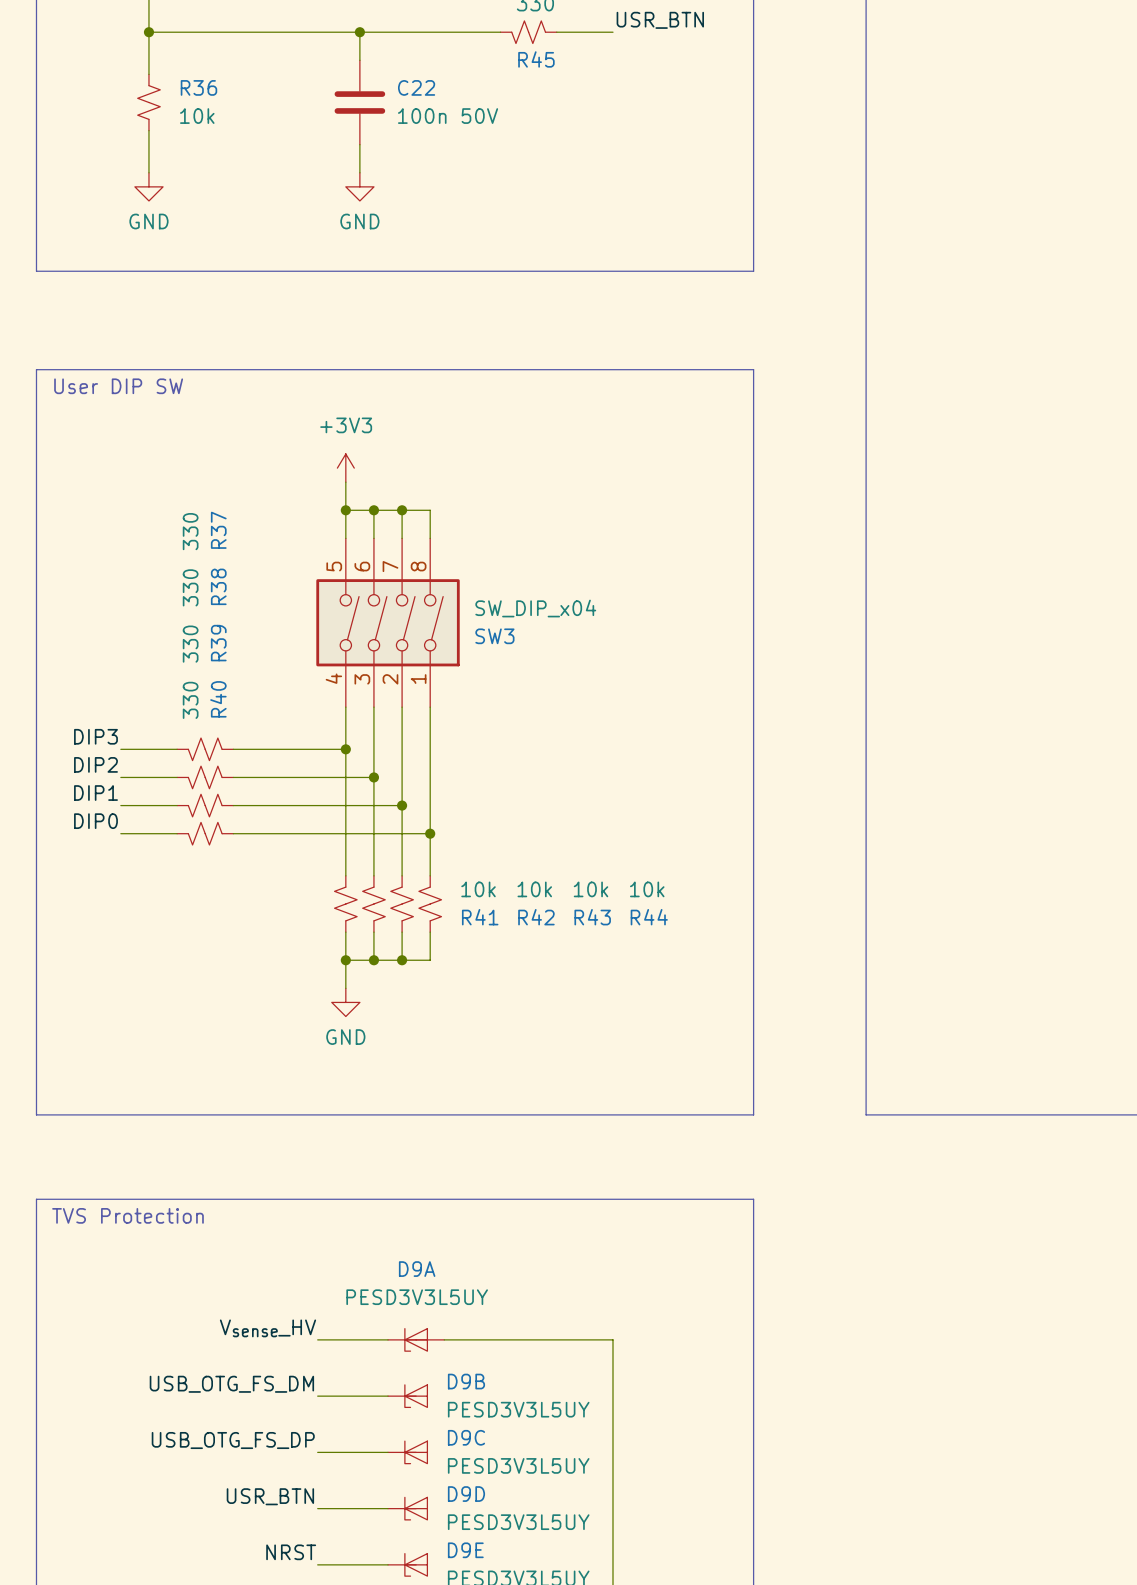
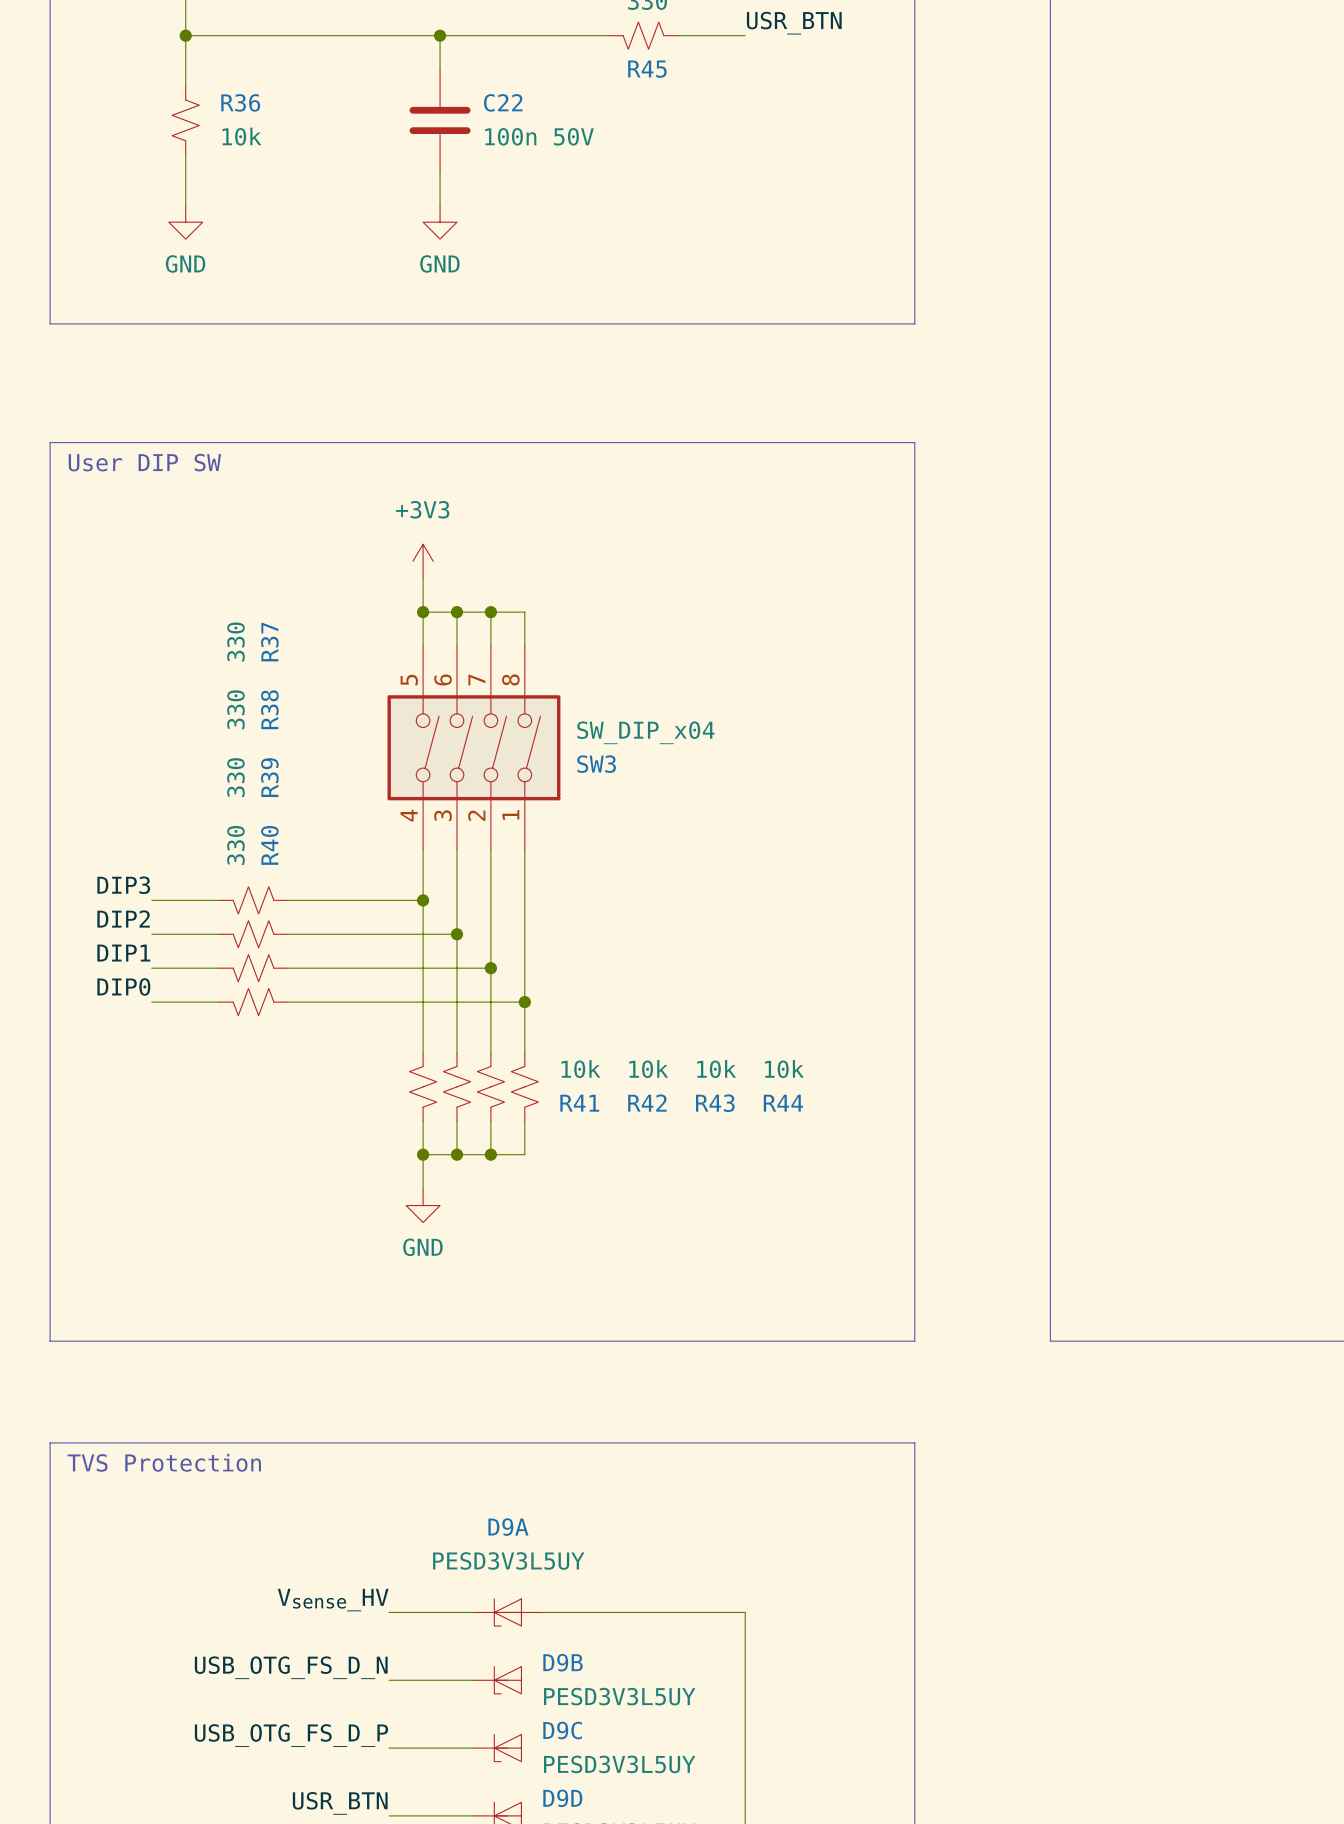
label: USB_OTG_FS_DM (231, 1384) -> USB_OTG_FS_D_N (291, 1667)
label: USB_OTG_FS_DP (233, 1440) -> USB_OTG_FS_D_P (291, 1735)

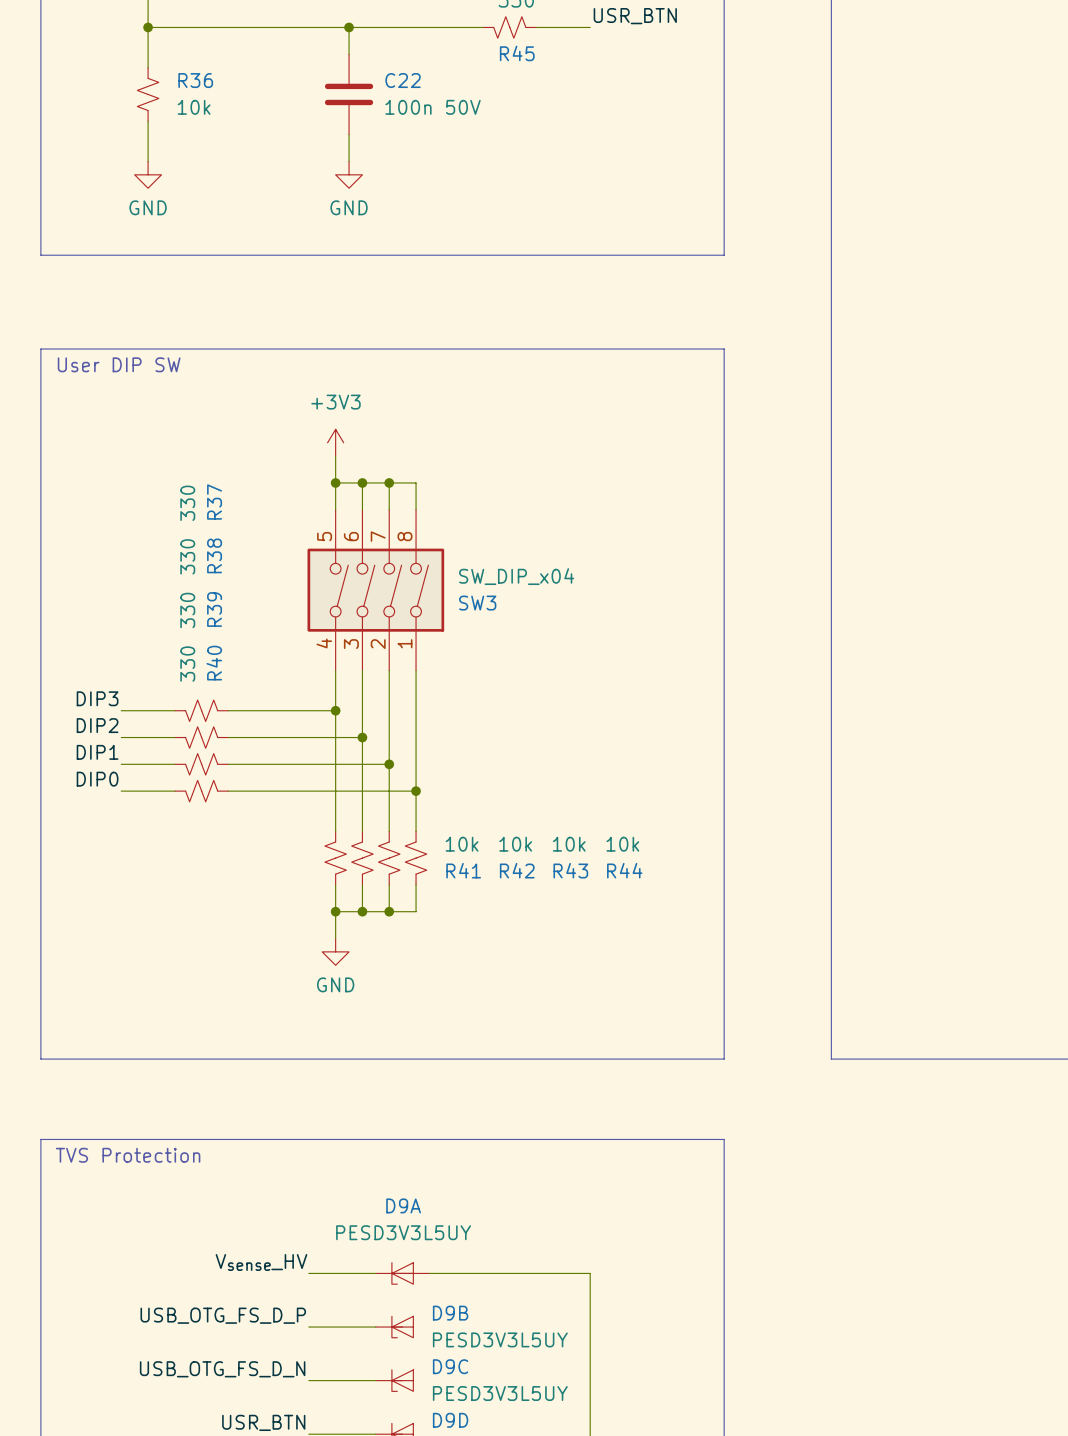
label: USB_OTG_FS_D_N (291, 1667) -> USB_OTG_FS_D_P (223, 1315)
label: USB_OTG_FS_D_P (291, 1735) -> USB_OTG_FS_D_N (222, 1369)

